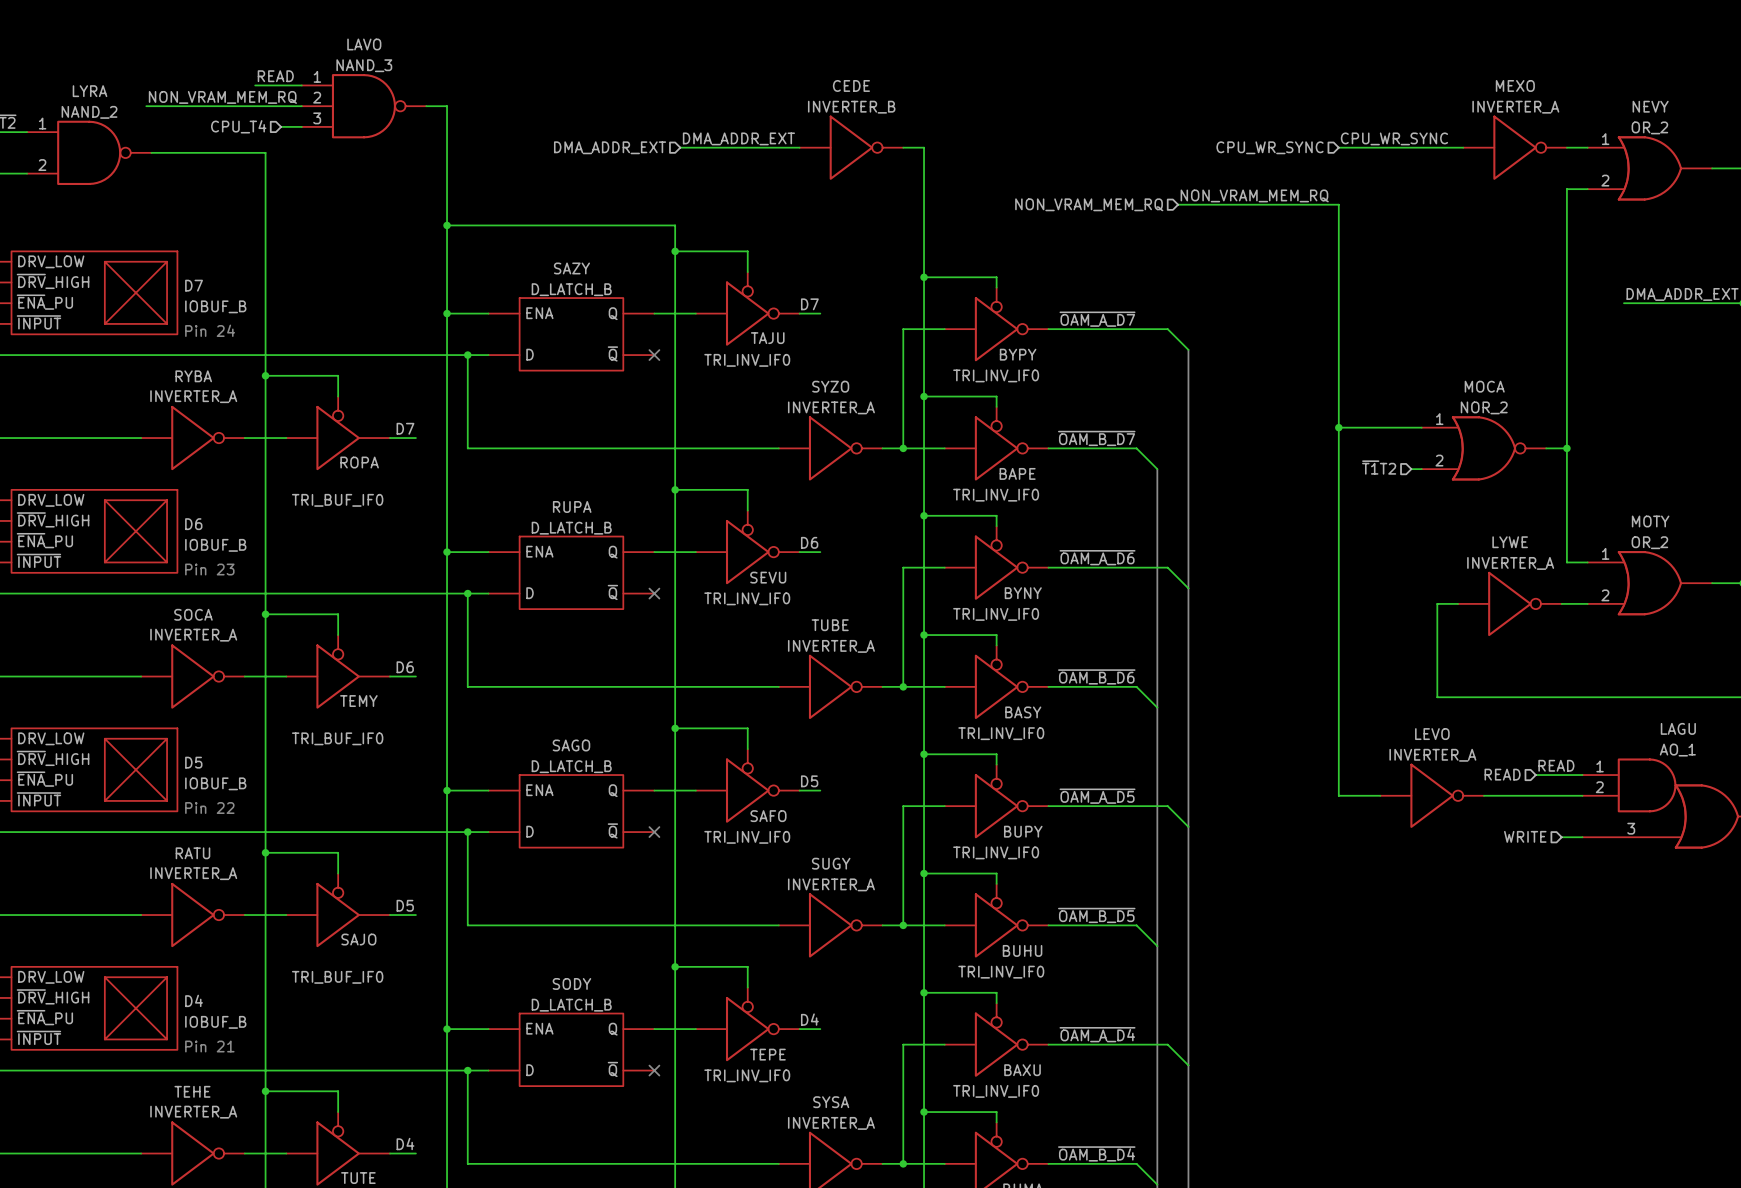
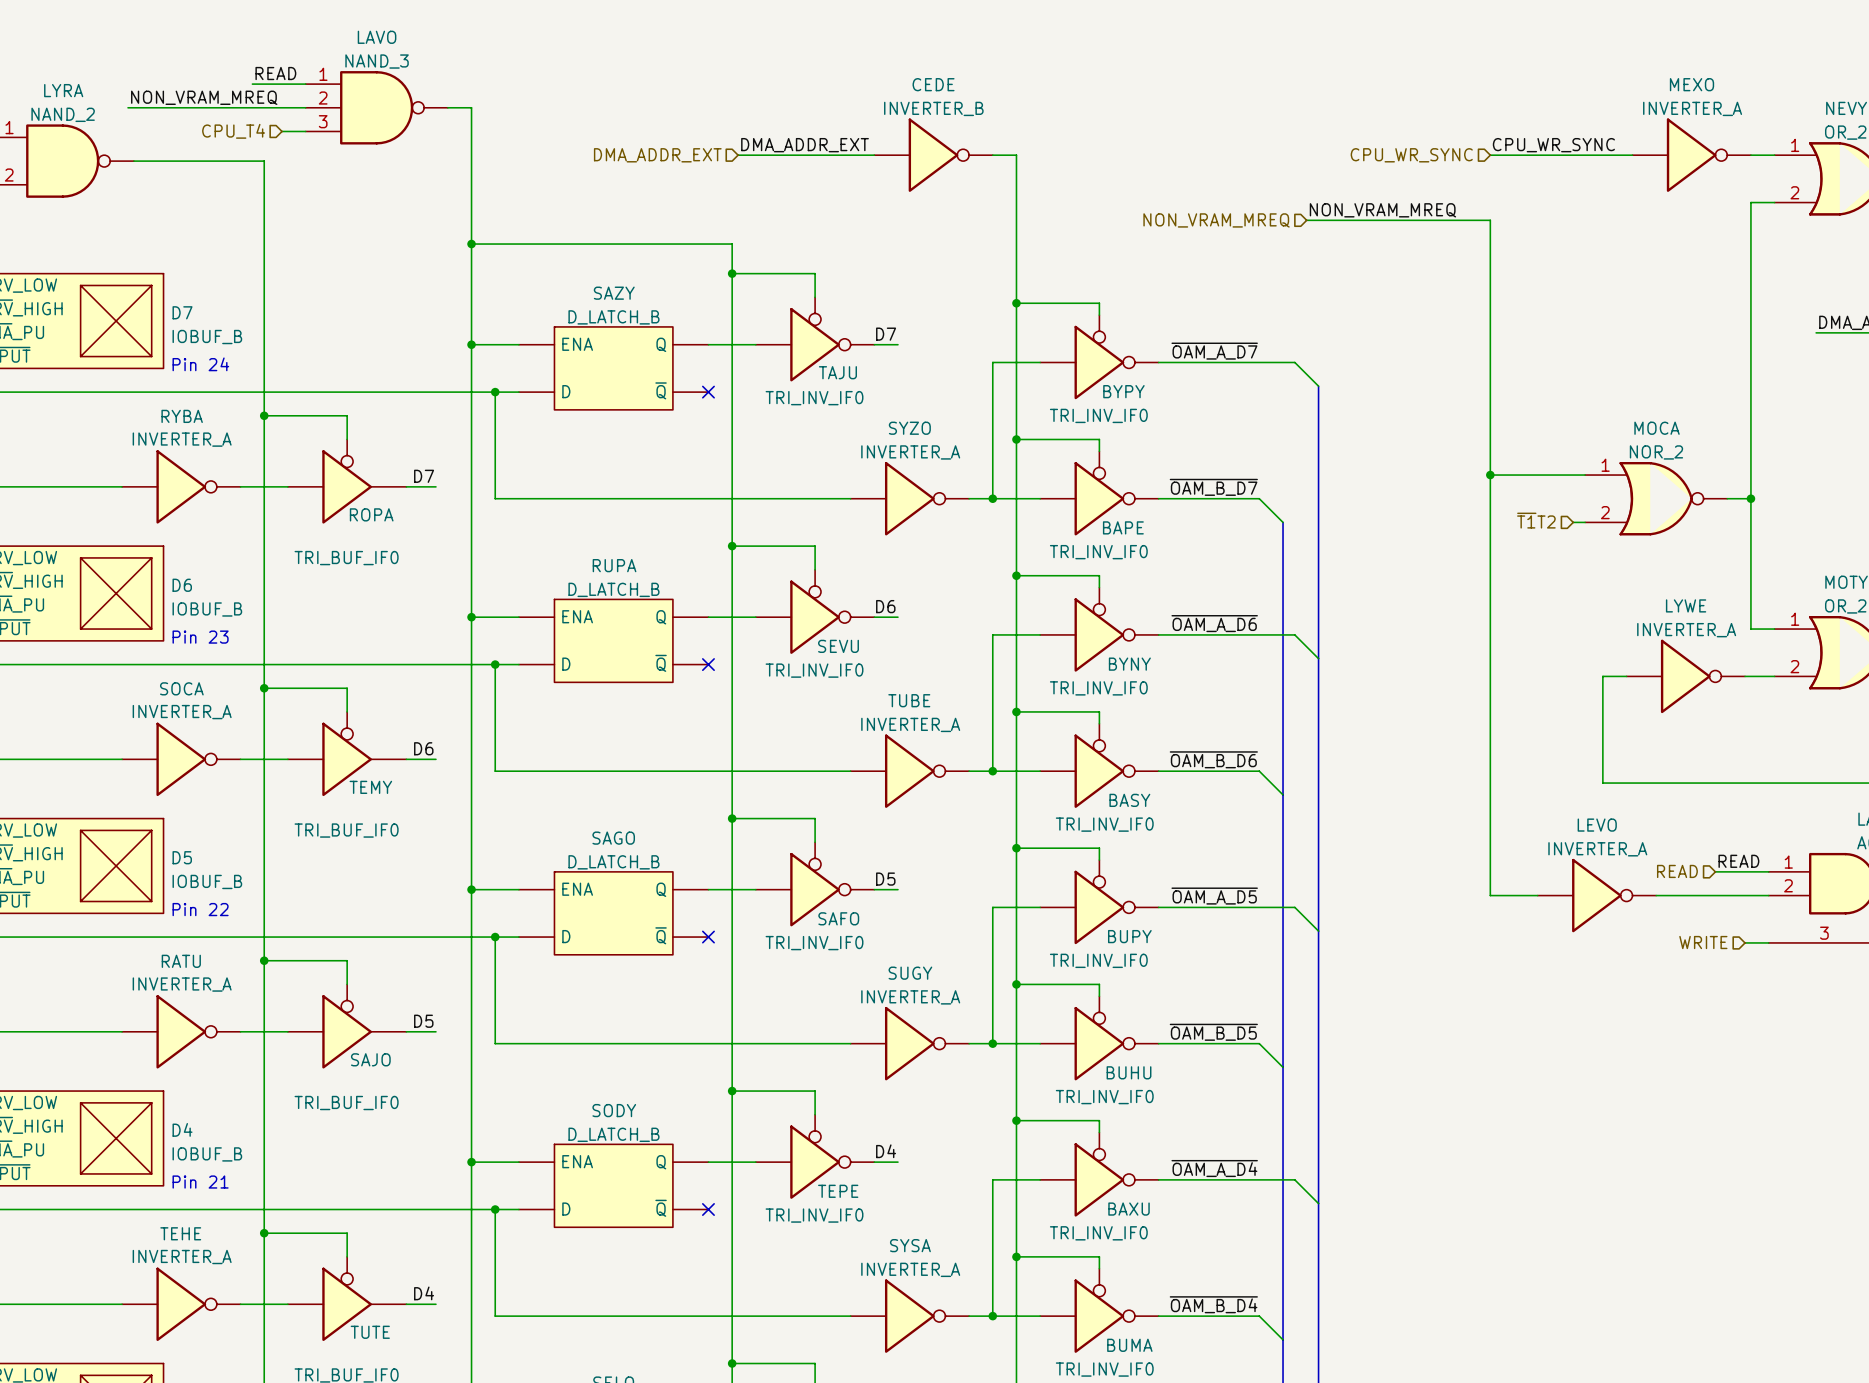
label: NON_VRAM_MEM_RQ (222, 97) -> NON_VRAM_MREQ (204, 97)
label: NON_VRAM_MEM_RQ (1254, 195) -> NON_VRAM_MREQ (1382, 210)
hierarchical label: NON_VRAM_MEM_RQ (1089, 204) -> NON_VRAM_MREQ (1216, 220)

